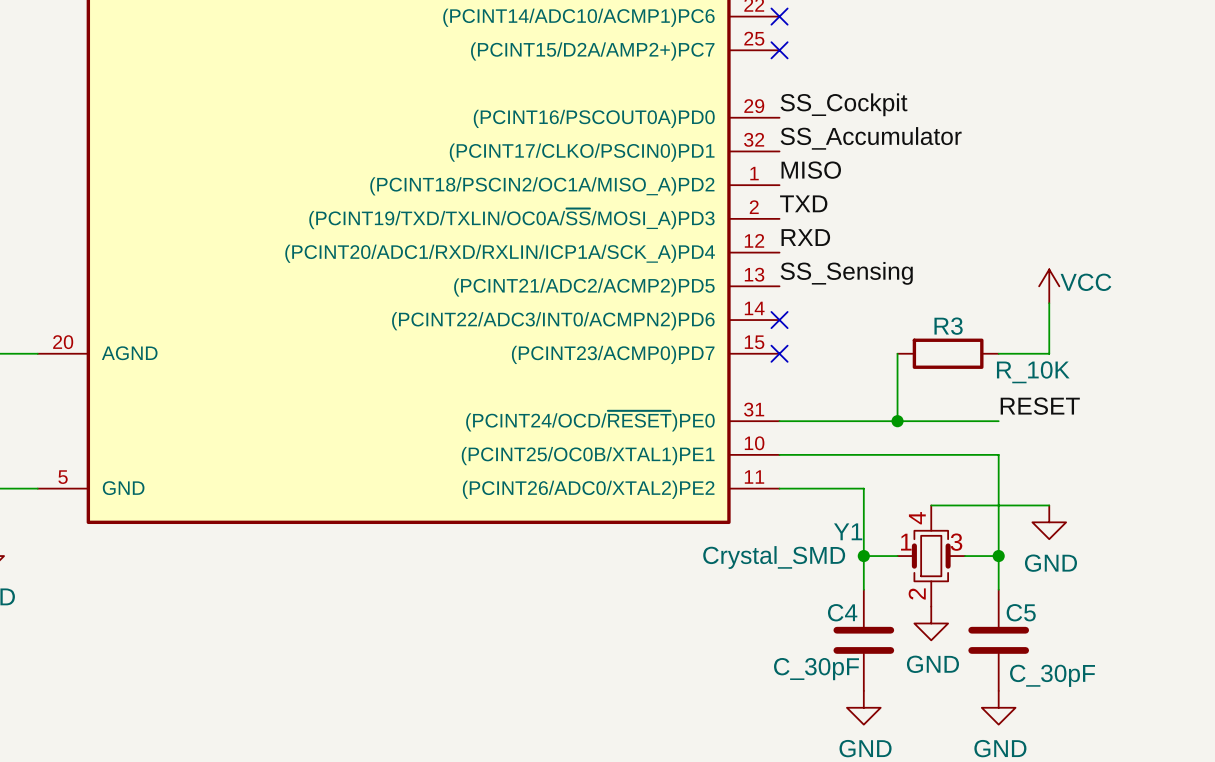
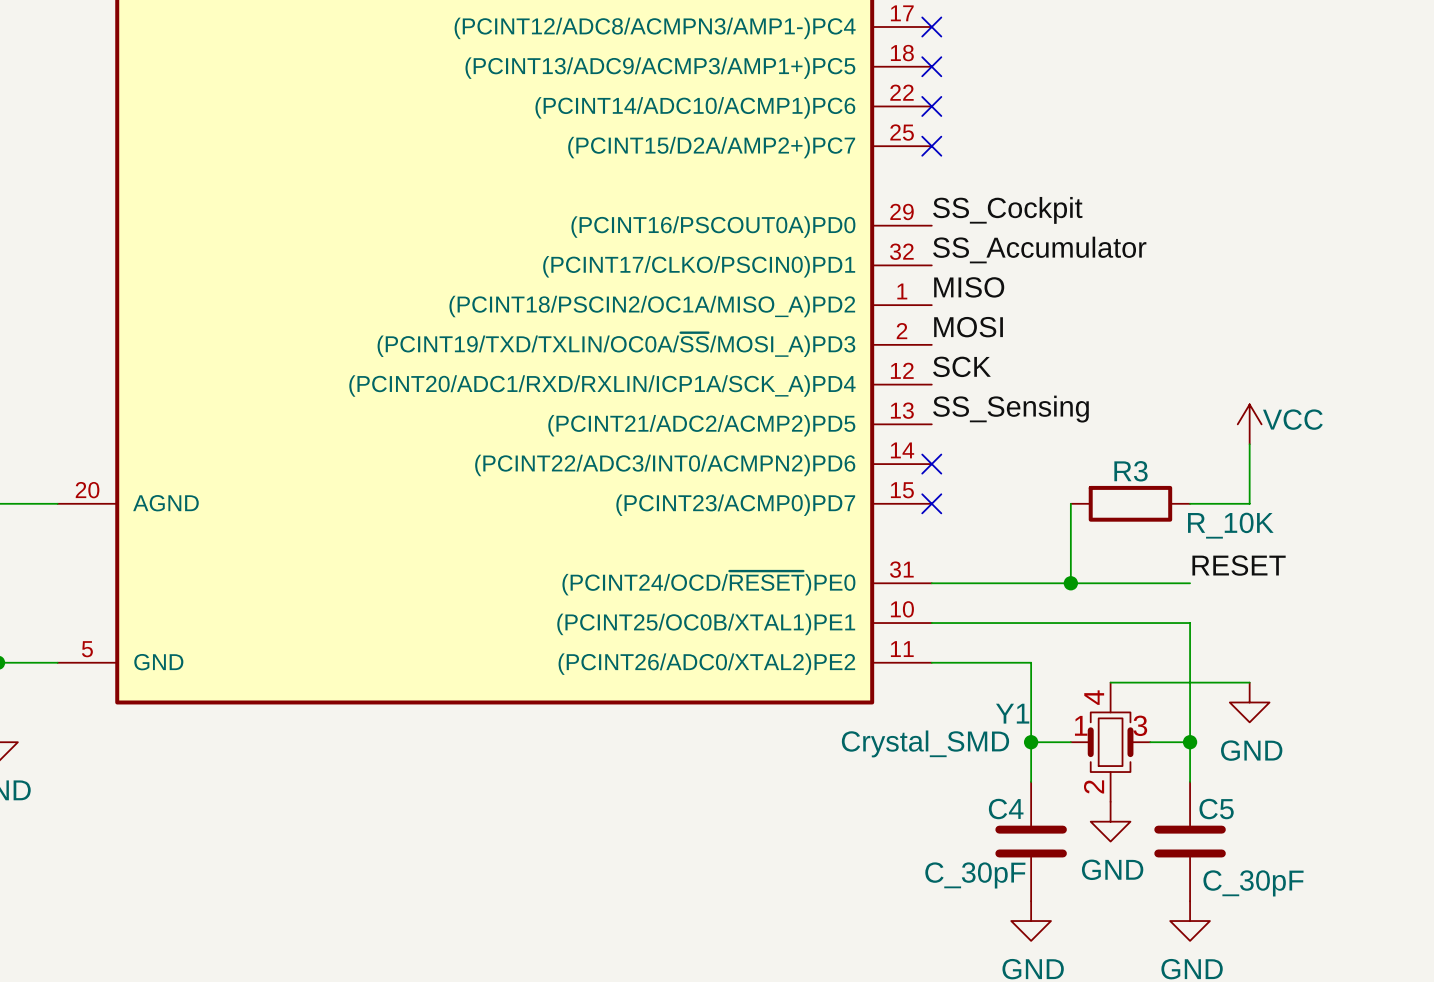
label: TXD (803, 203) -> MOSI (968, 327)
label: RXD (805, 237) -> SCK (961, 366)

